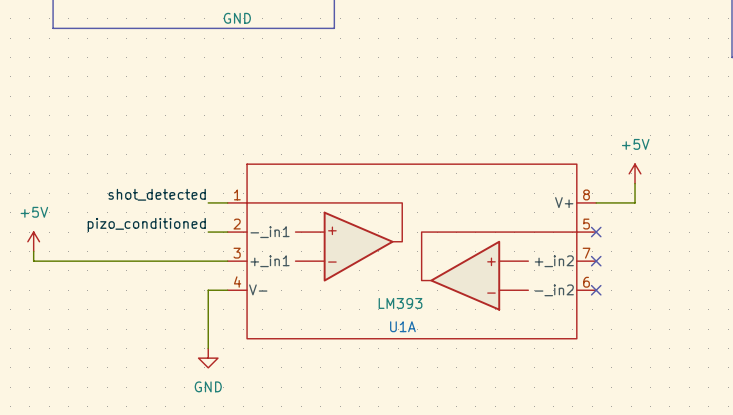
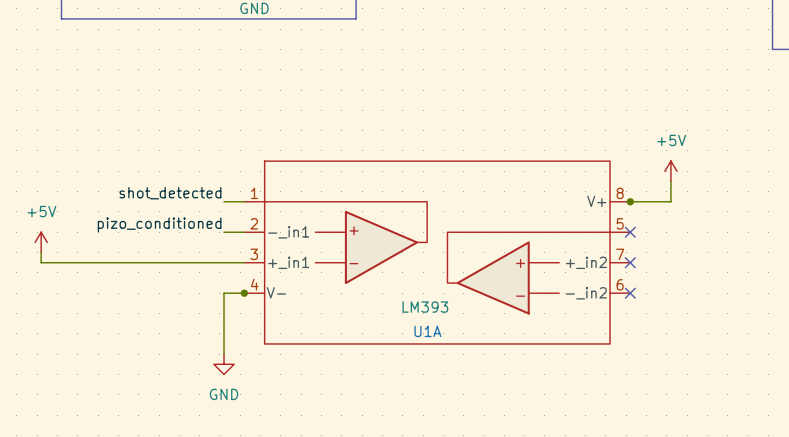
junction: none -> (630, 201)
junction: none -> (244, 293)

